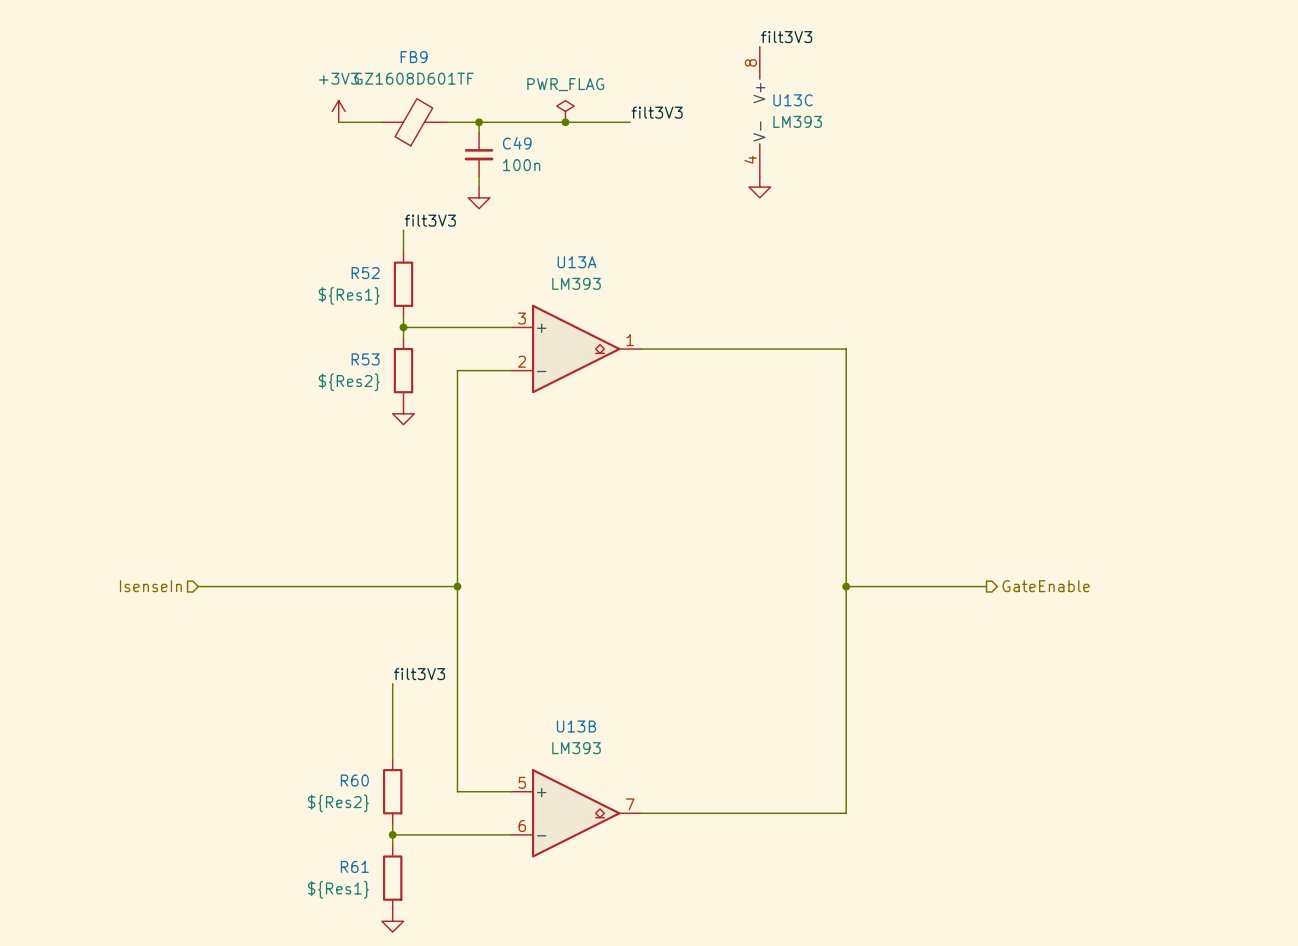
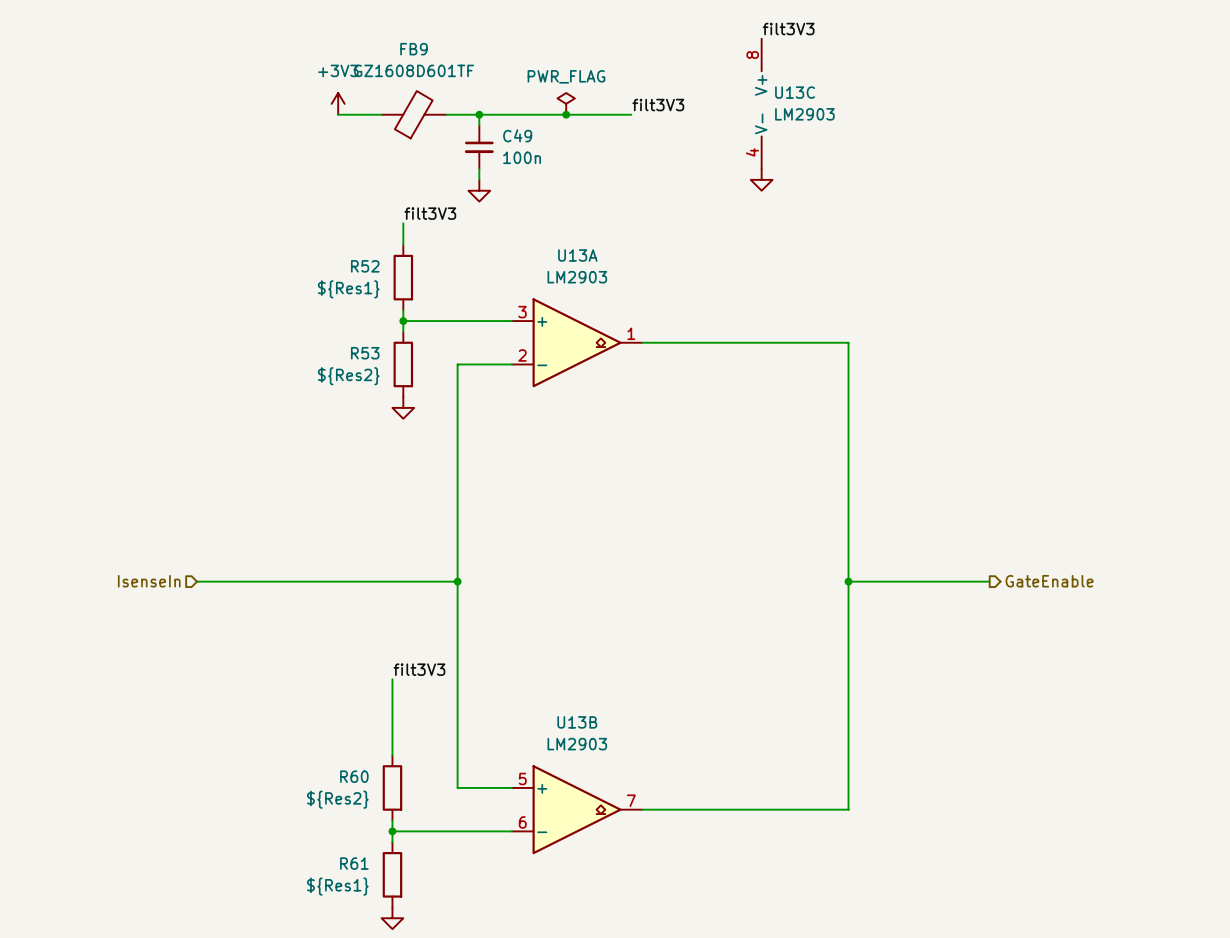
U13C value: LM393 (797, 121) -> LM2903 (804, 114)
U13A value: LM393 (576, 283) -> LM2903 (577, 277)
U13B value: LM393 (576, 748) -> LM2903 (577, 744)

